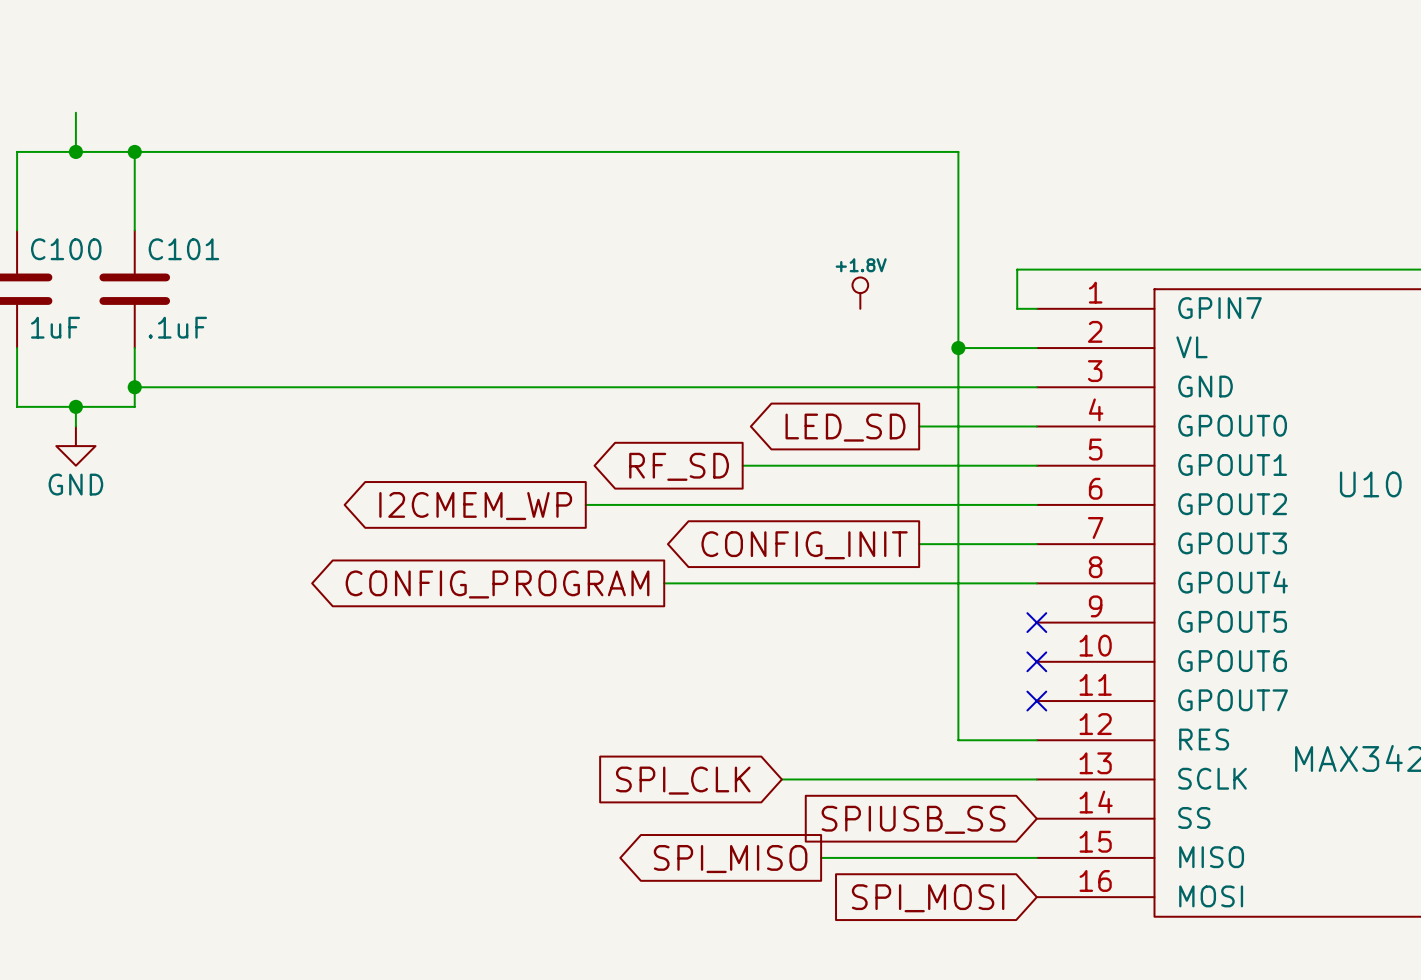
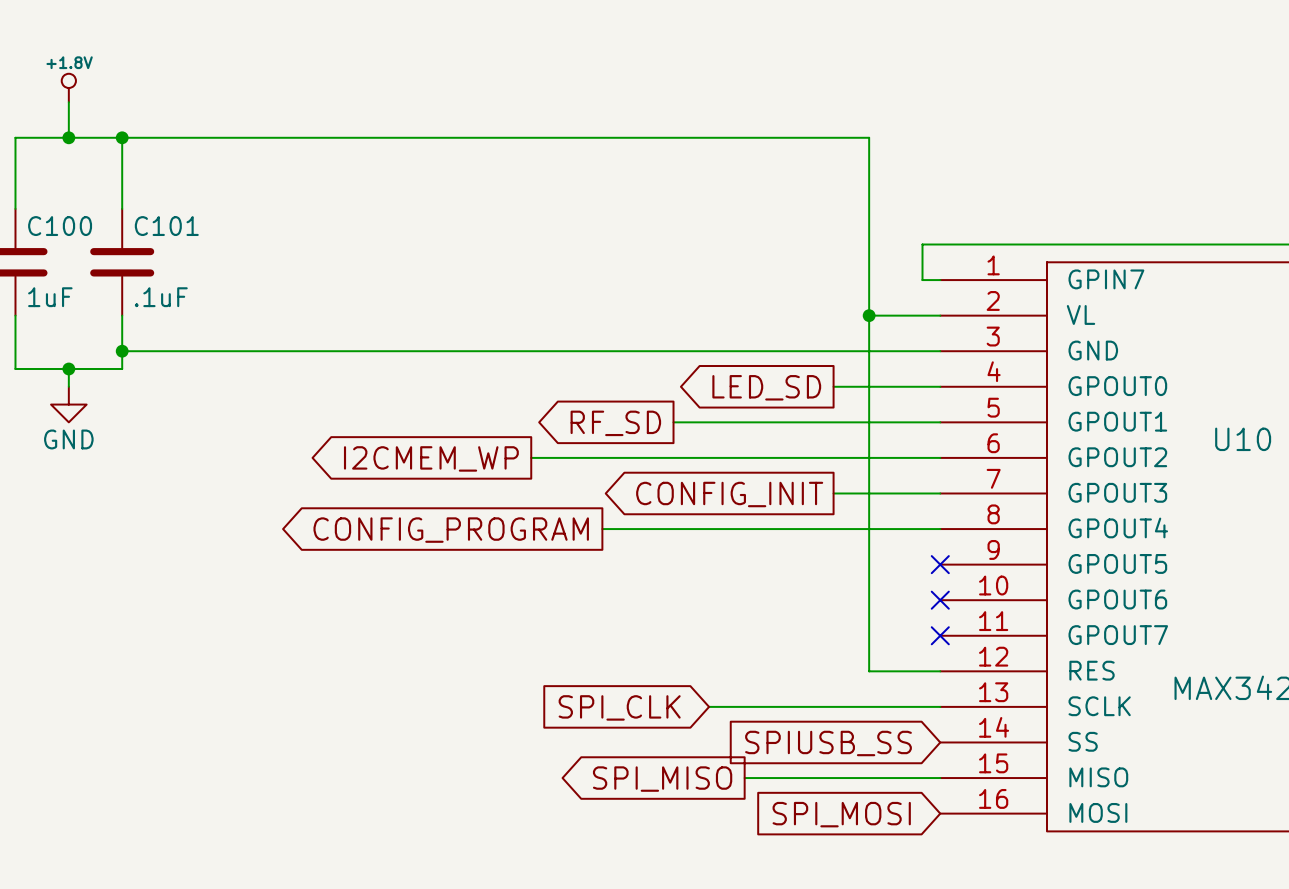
power symbol: none -> +1.8V (68, 87)
power symbol: +1.8V (860, 293) -> none

